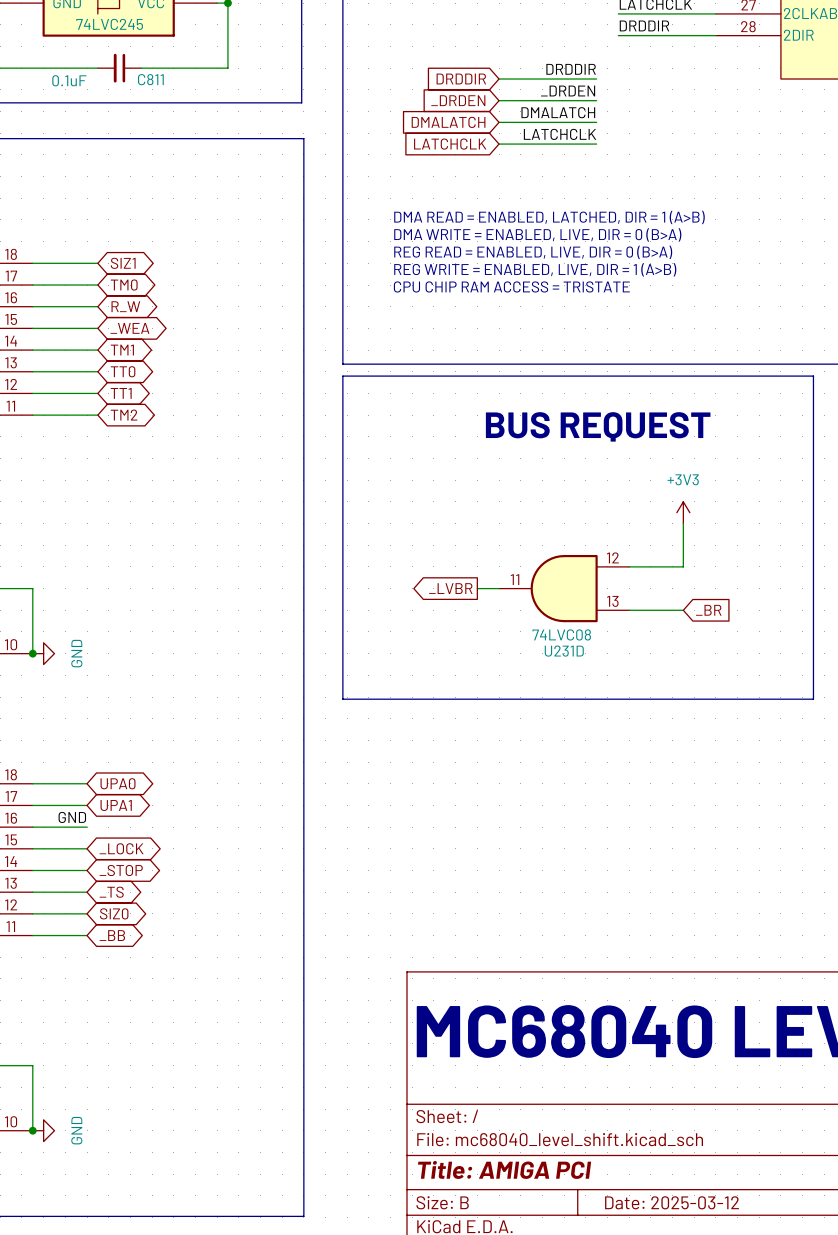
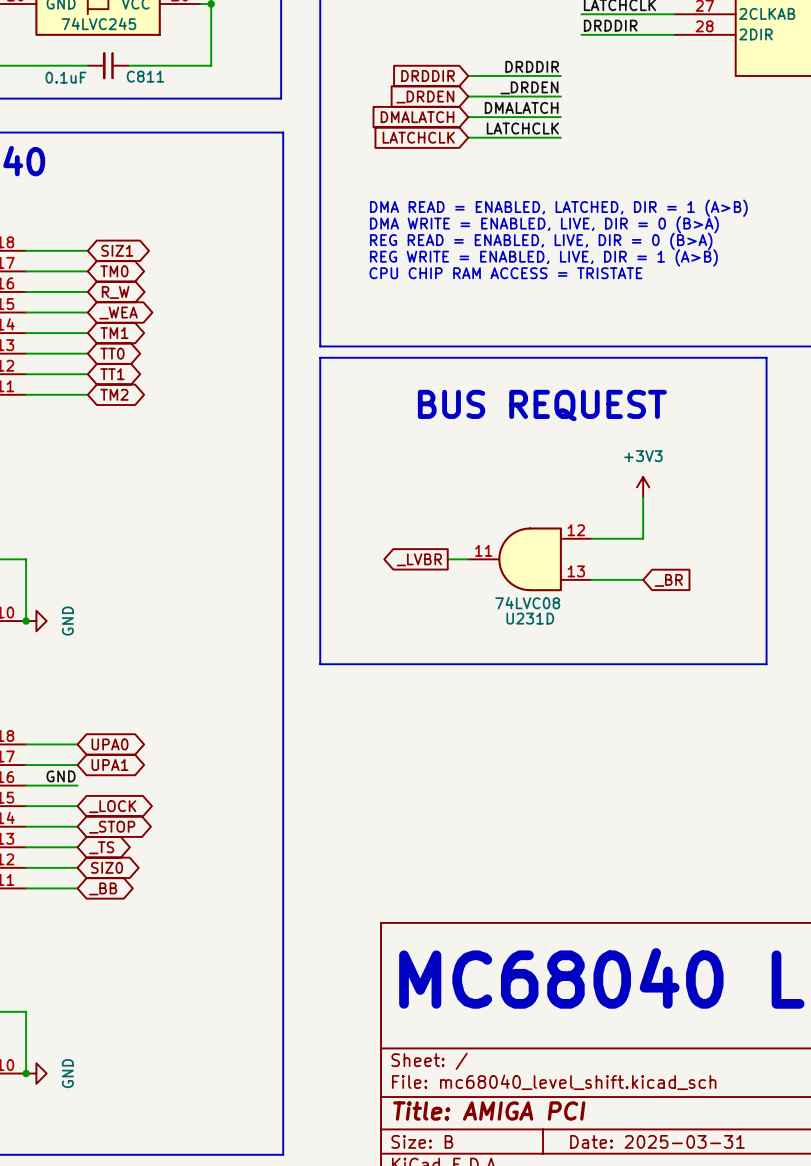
title block: Date: 2025-03-12 (672, 1202) -> Date: 2025-03-31 (657, 1141)

